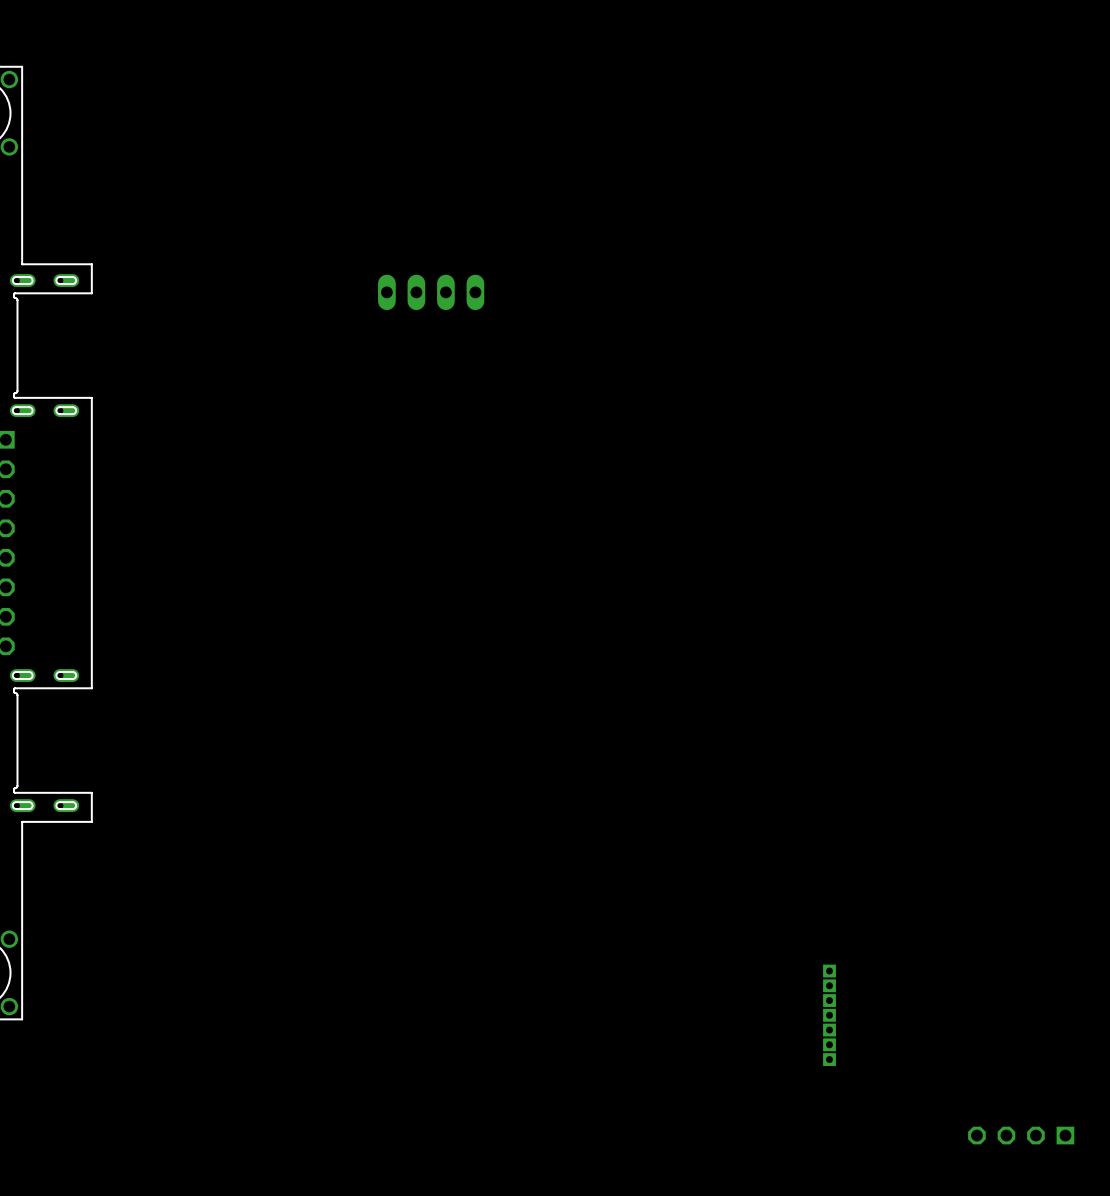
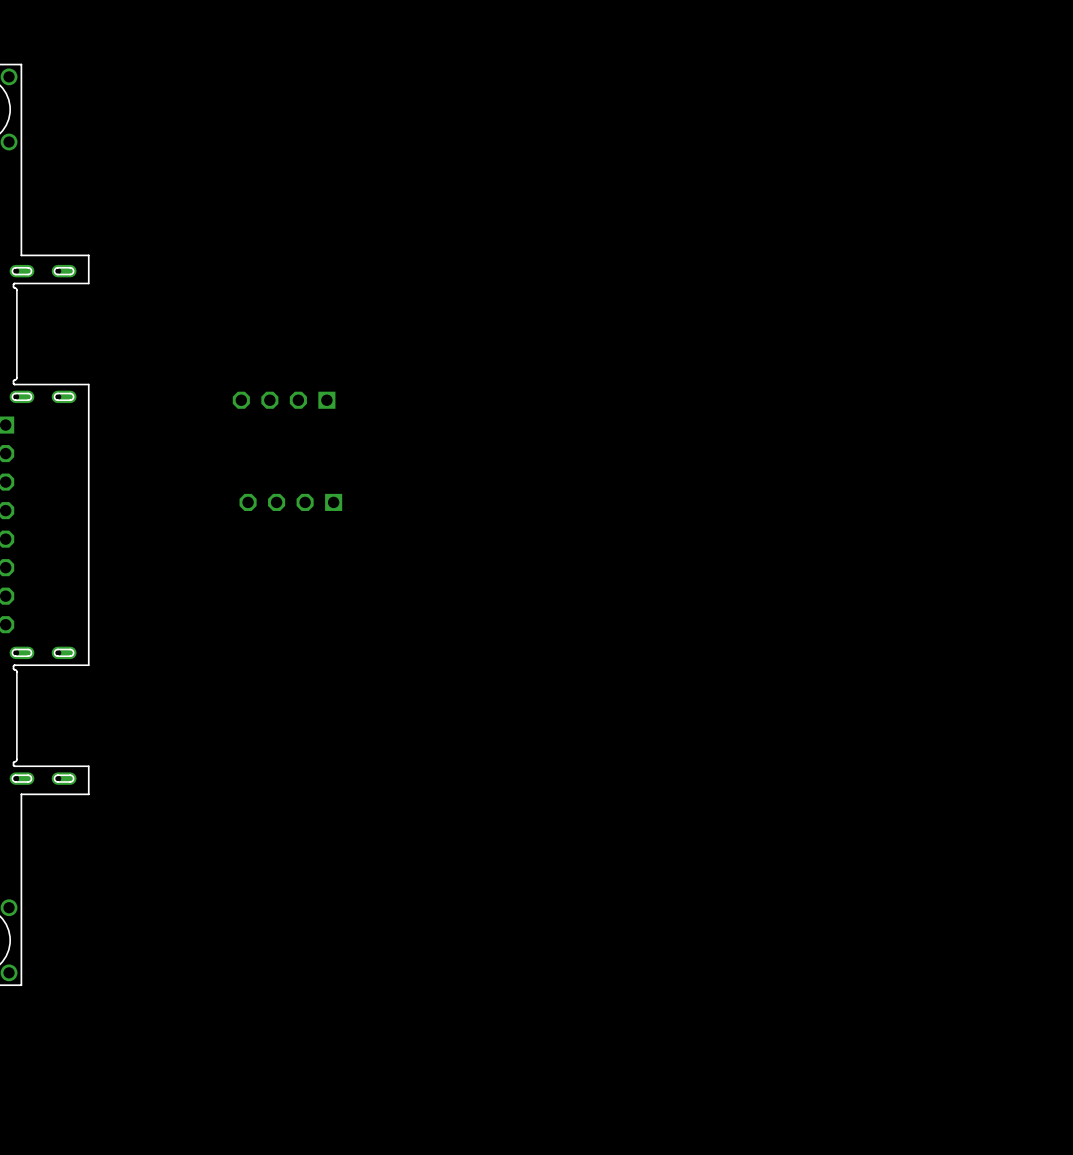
part: (431, 292) -> none
part: none -> (284, 400)
part: none -> (290, 502)
part: (829, 1015) -> none
part: (1021, 1135) -> none

